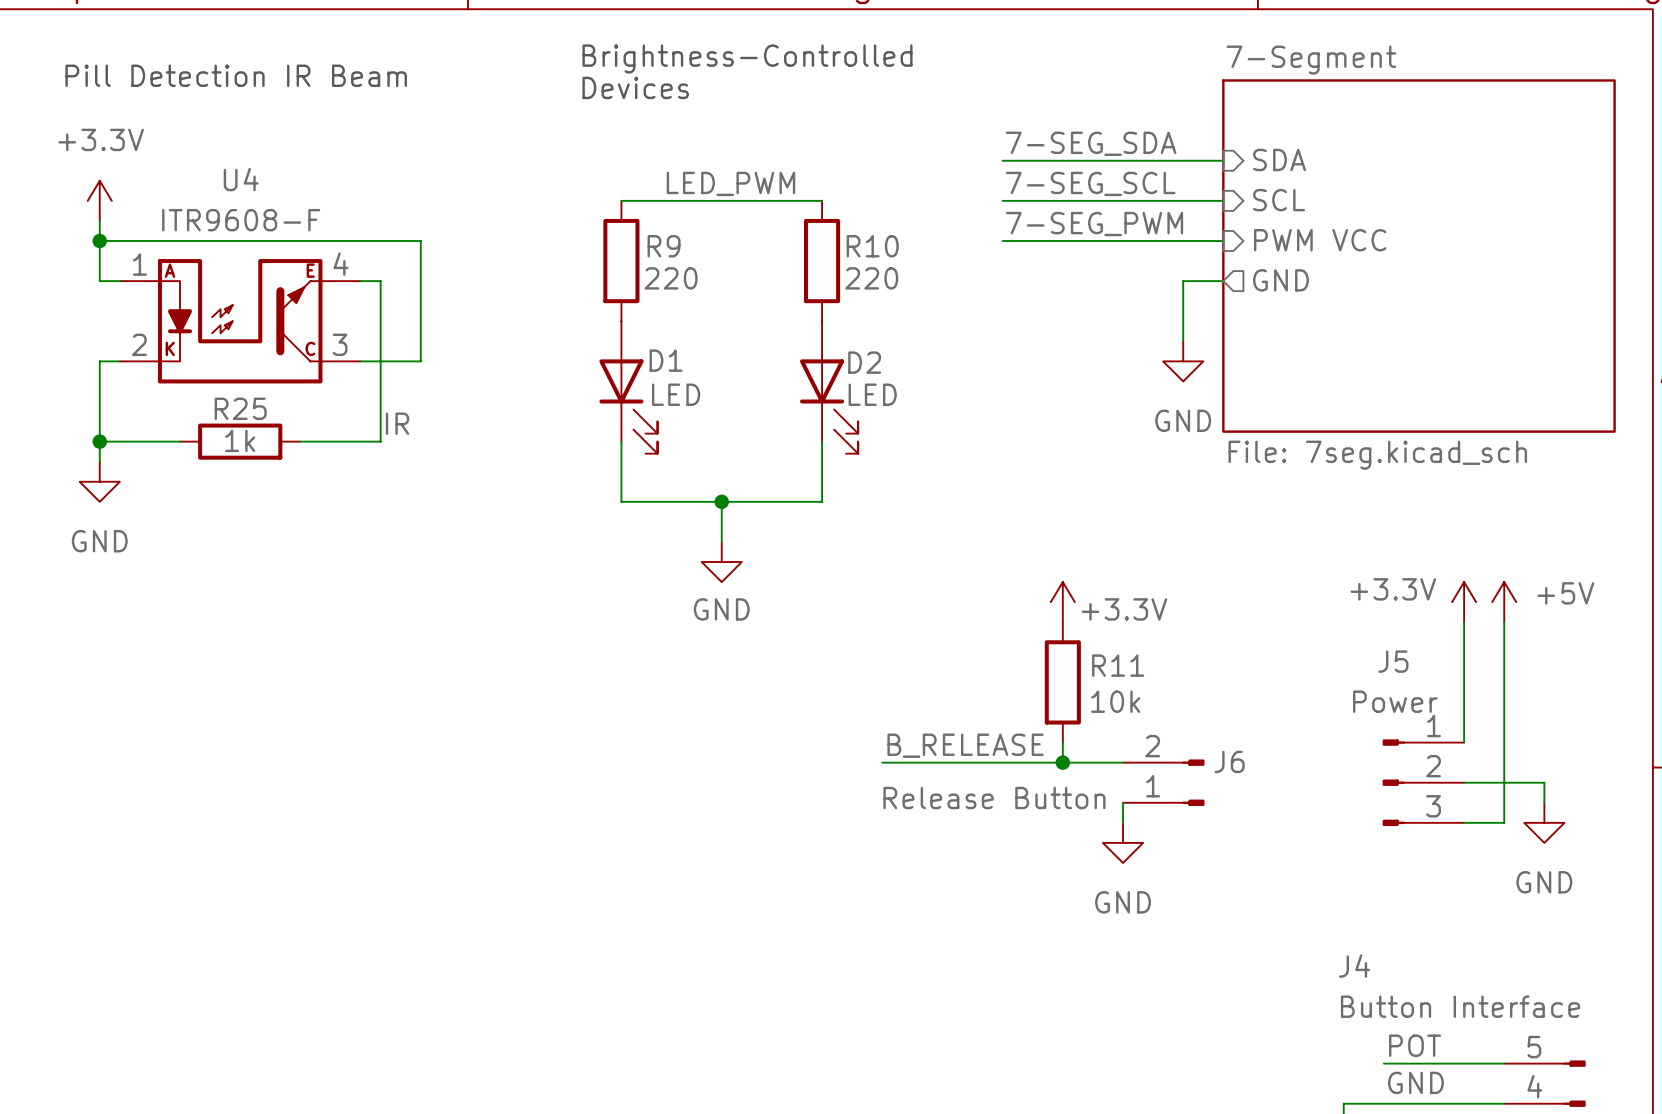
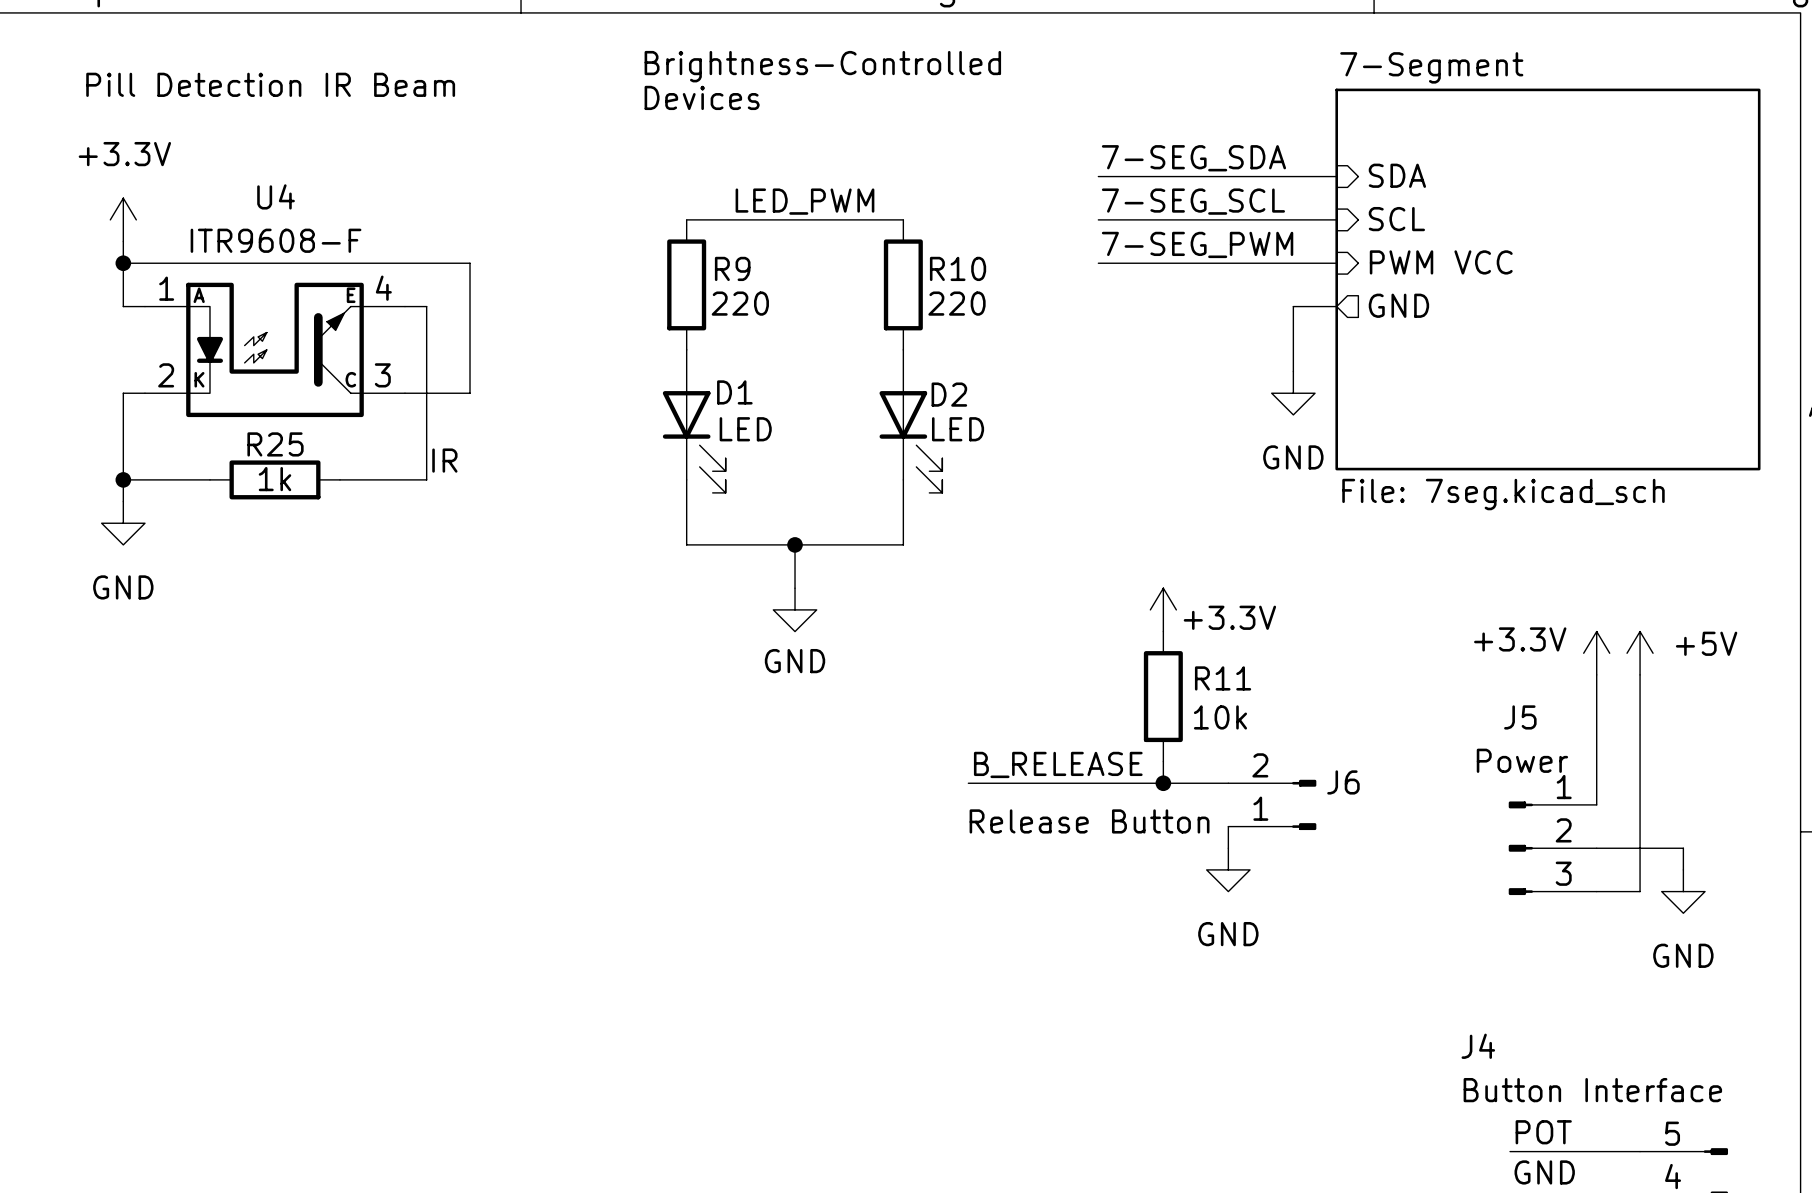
power symbol position: +3.3V (1062, 602) -> +3.3V (1163, 609)
R11 position: (1062, 682) -> (1163, 696)
wire: none -> (968, 783) (1228, 783)
wire: (1062, 742) (1062, 762) -> (1163, 761) (1163, 783)
label position: B_RELEASE (965, 745) -> B_RELEASE (1058, 764)
wire: (882, 762) (1123, 762) -> (1228, 848) (1228, 826)
junction position: (1062, 762) -> (1163, 783)
J6 position: (1163, 782) -> (1272, 804)
wire: (1123, 802) (1123, 822) -> none
power symbol position: GND (1123, 842) -> GND (1228, 869)

